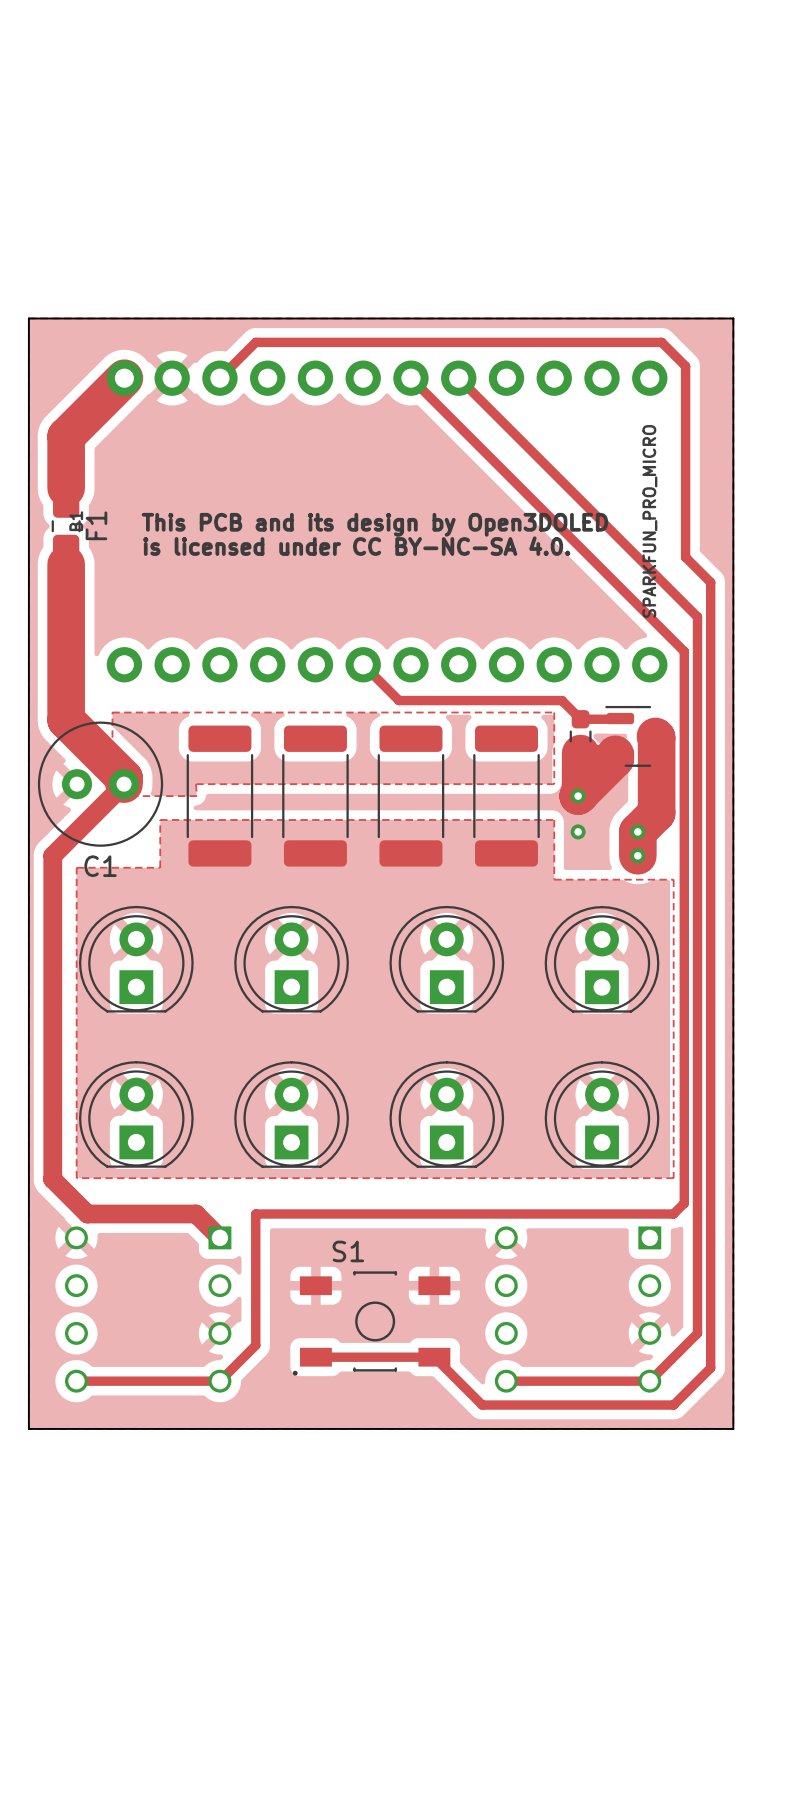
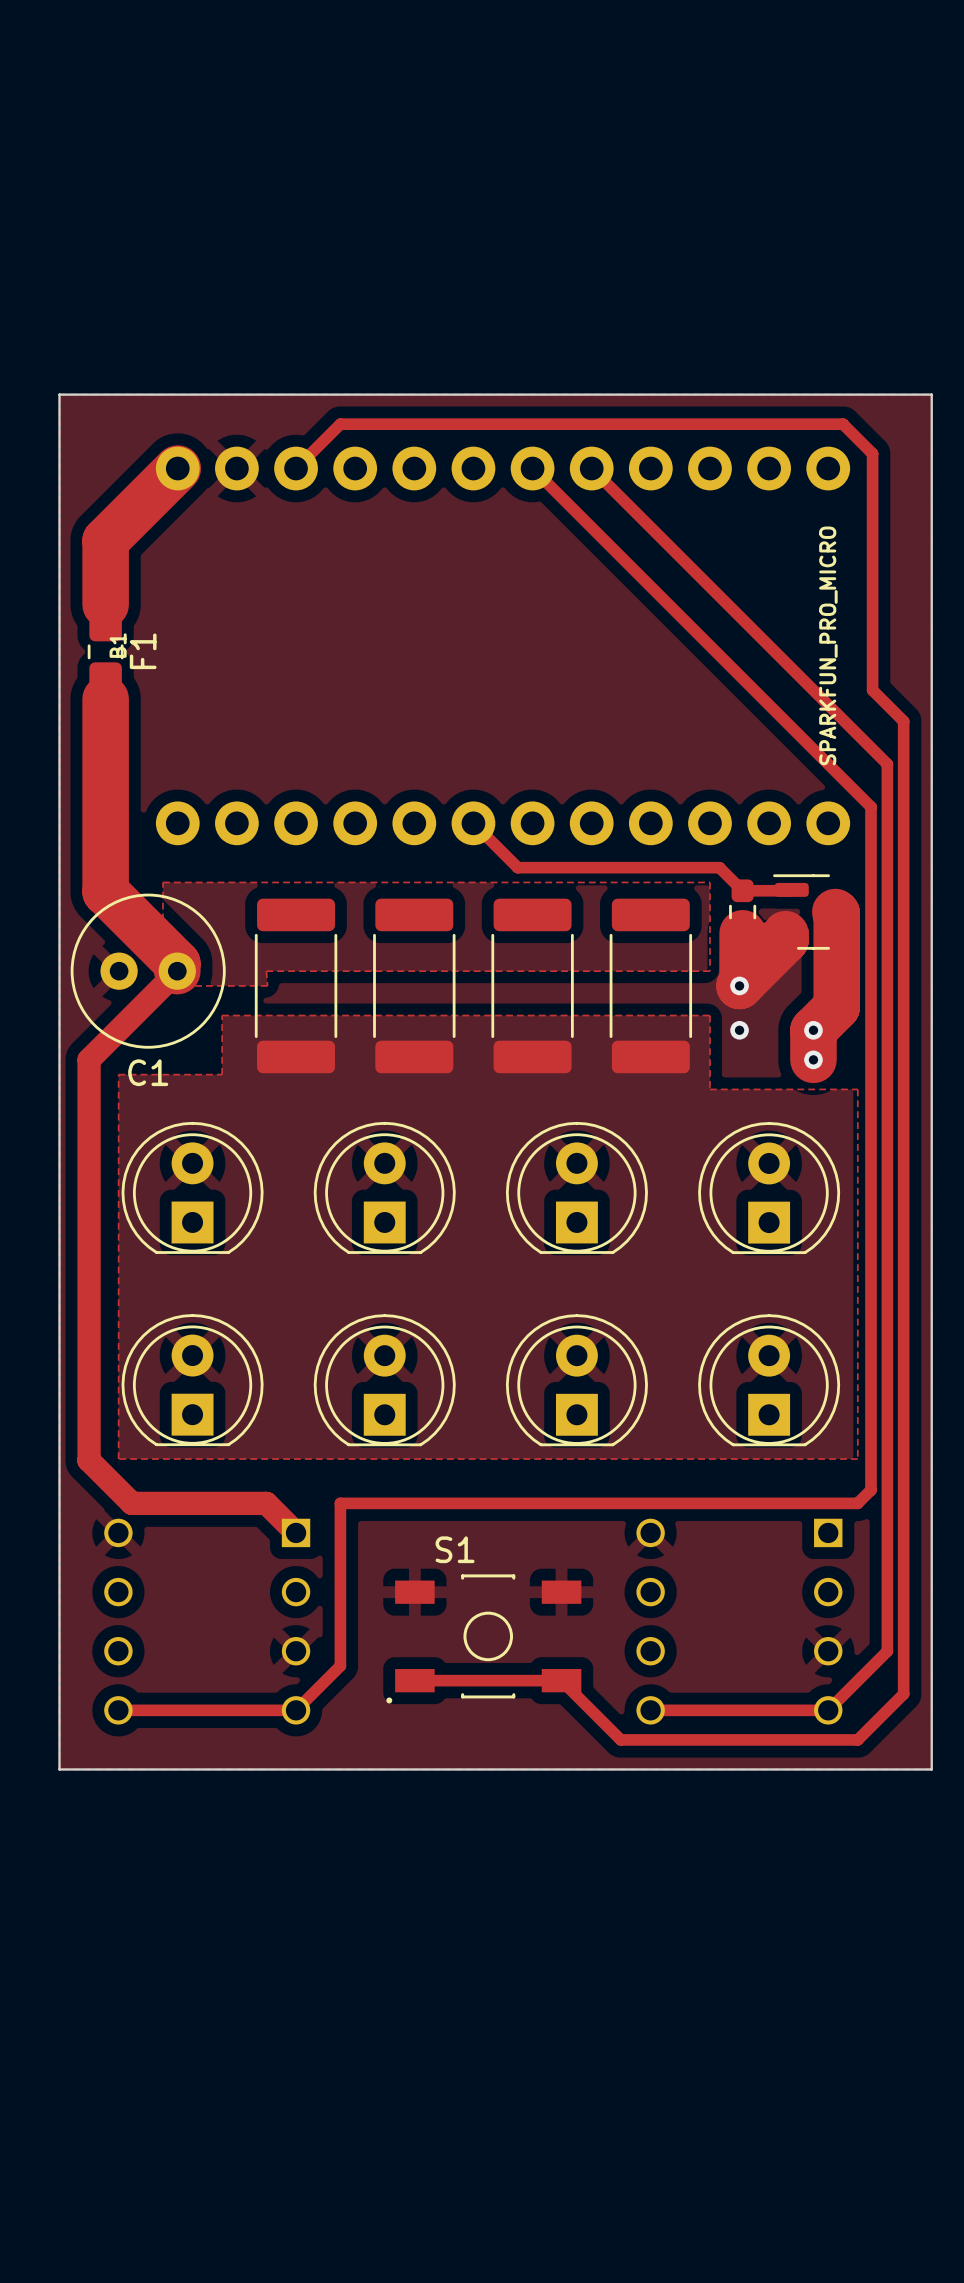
text: This PCB and its design by Open3DOLED (374, 524) -> none
text: is licensed under CC BY-NC-SA 4.0. (356, 546) -> none

